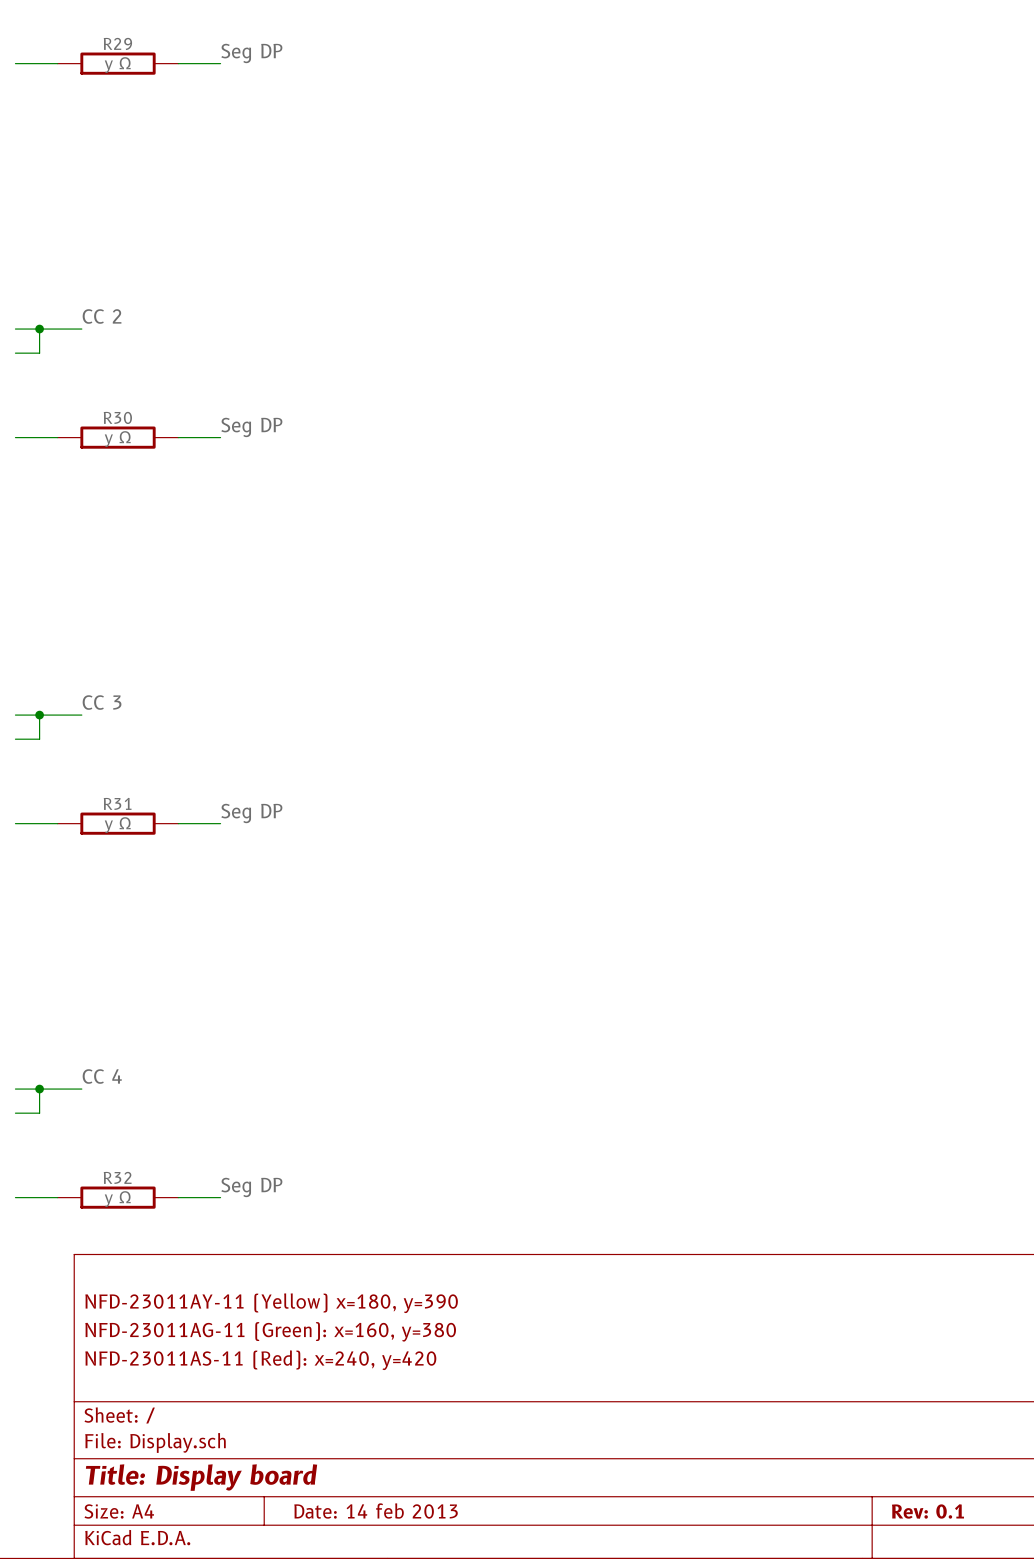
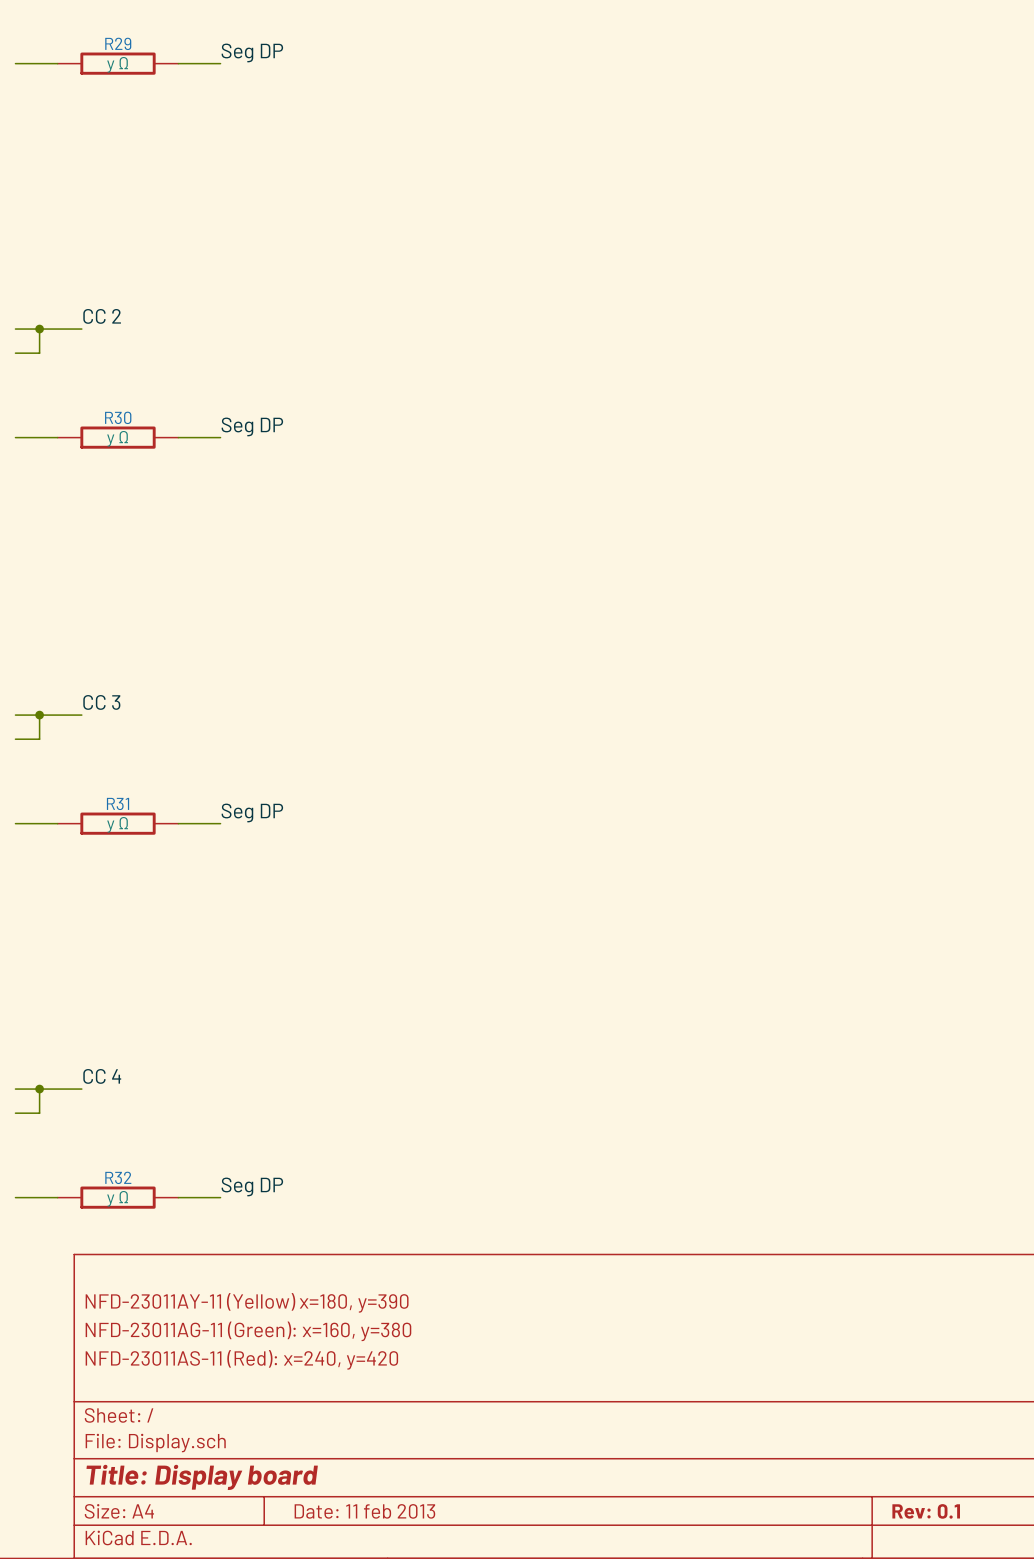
title block: Date: 14 feb 2013 (376, 1510) -> Date: 11 feb 2013 (364, 1511)

